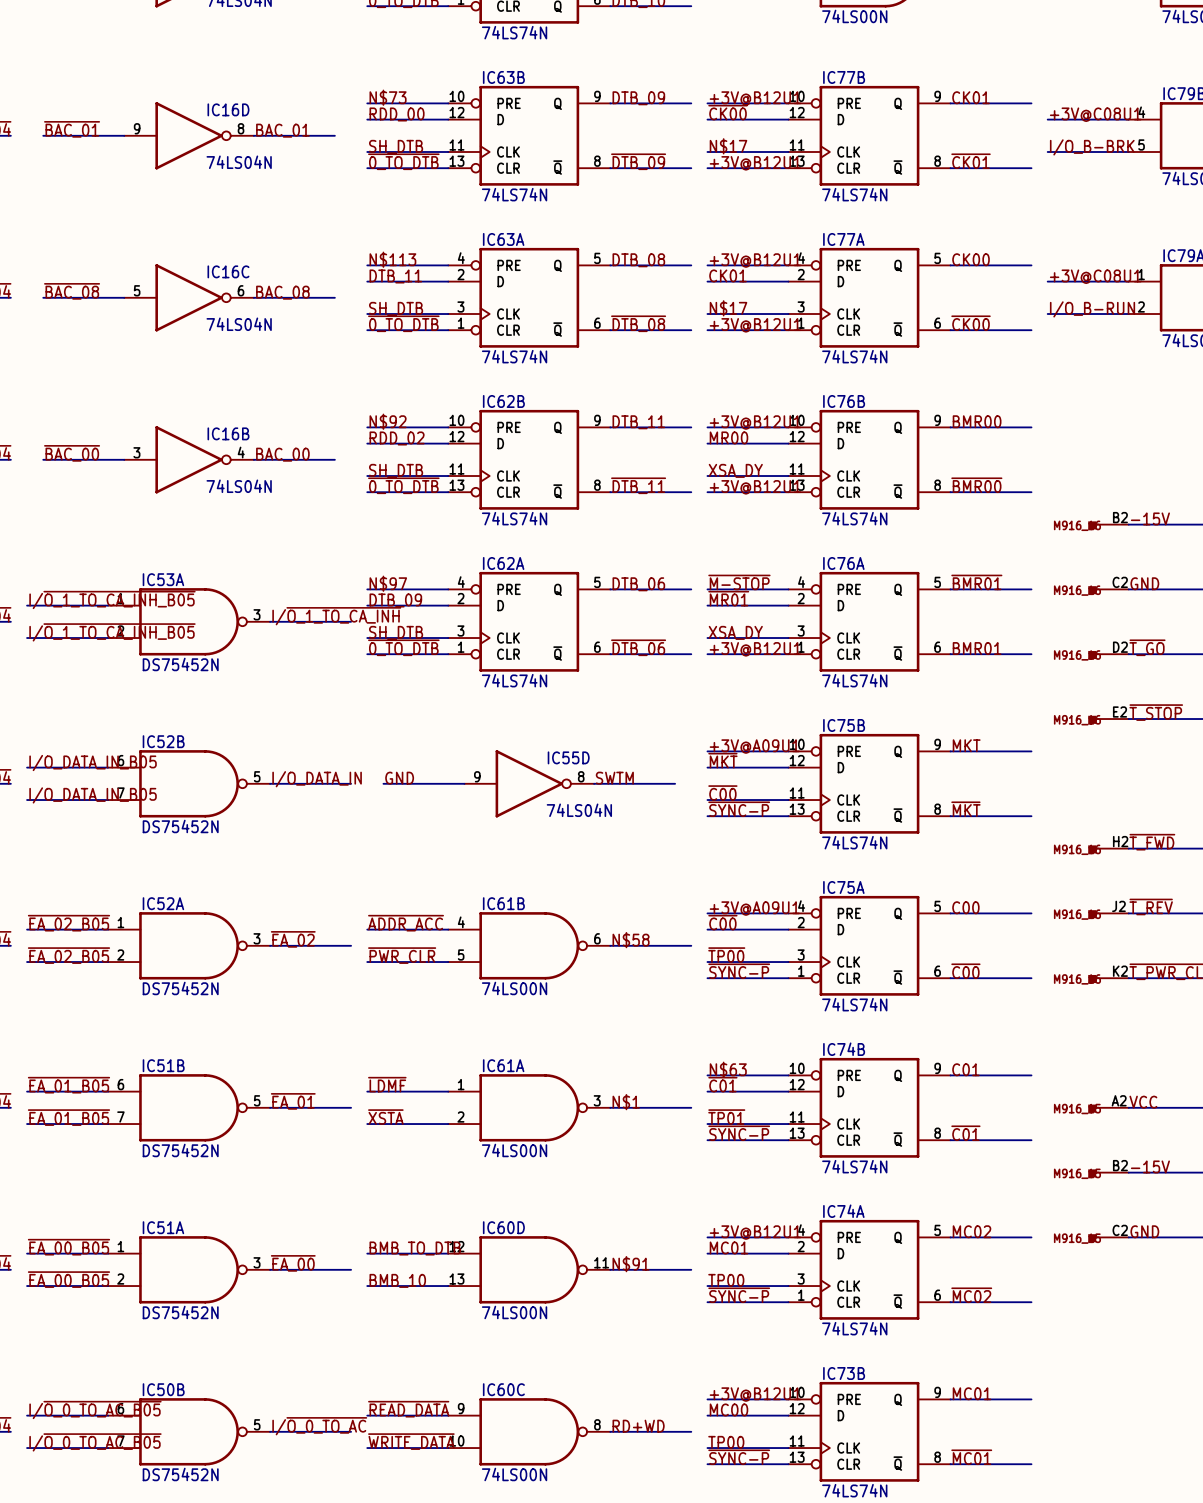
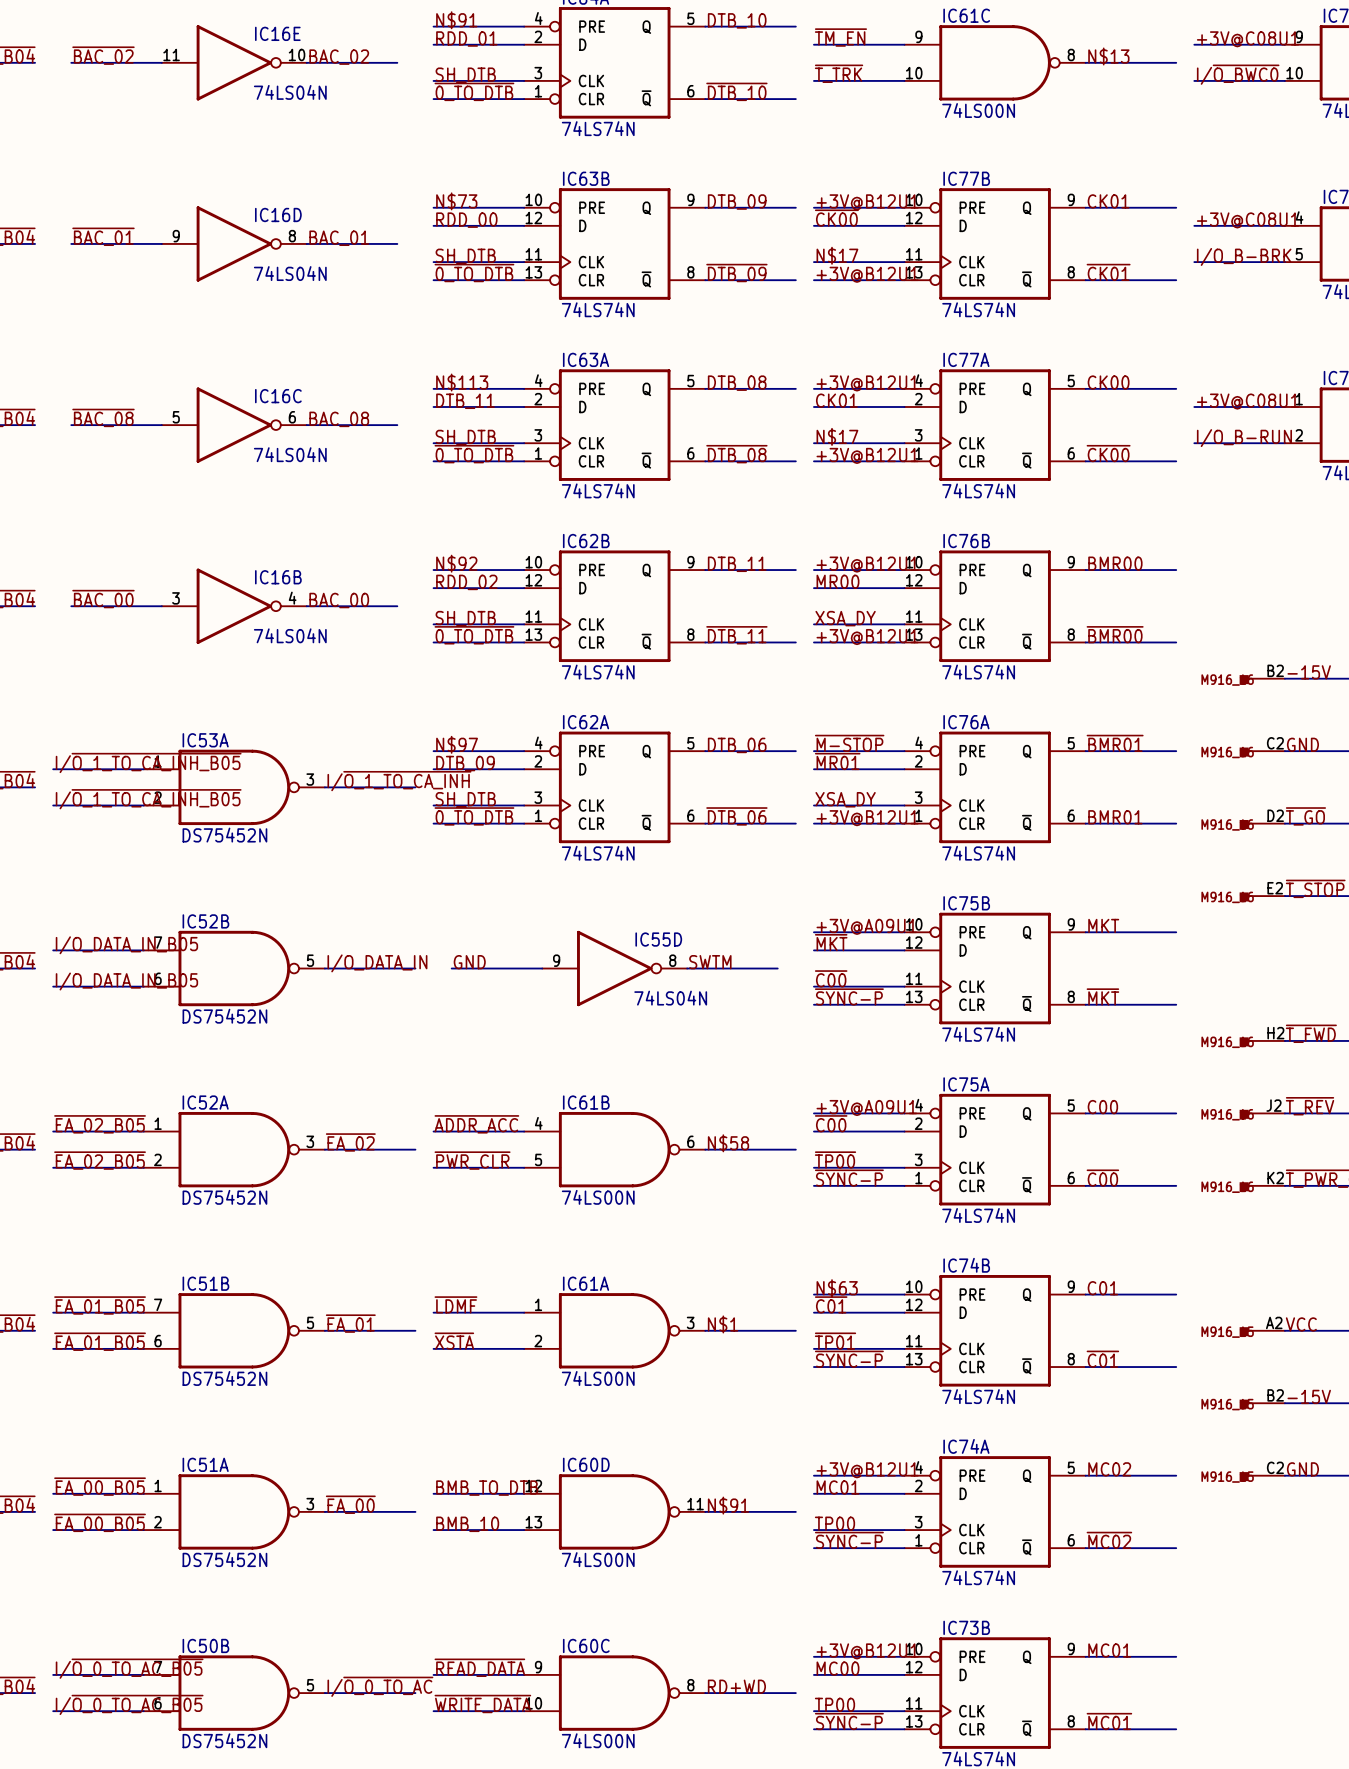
IC52B flip: as is (189, 783) -> up-down (234, 968)
IC51B flip: as is (189, 1107) -> up-down (234, 1330)
IC50B flip: as is (189, 1431) -> up-down (234, 1693)

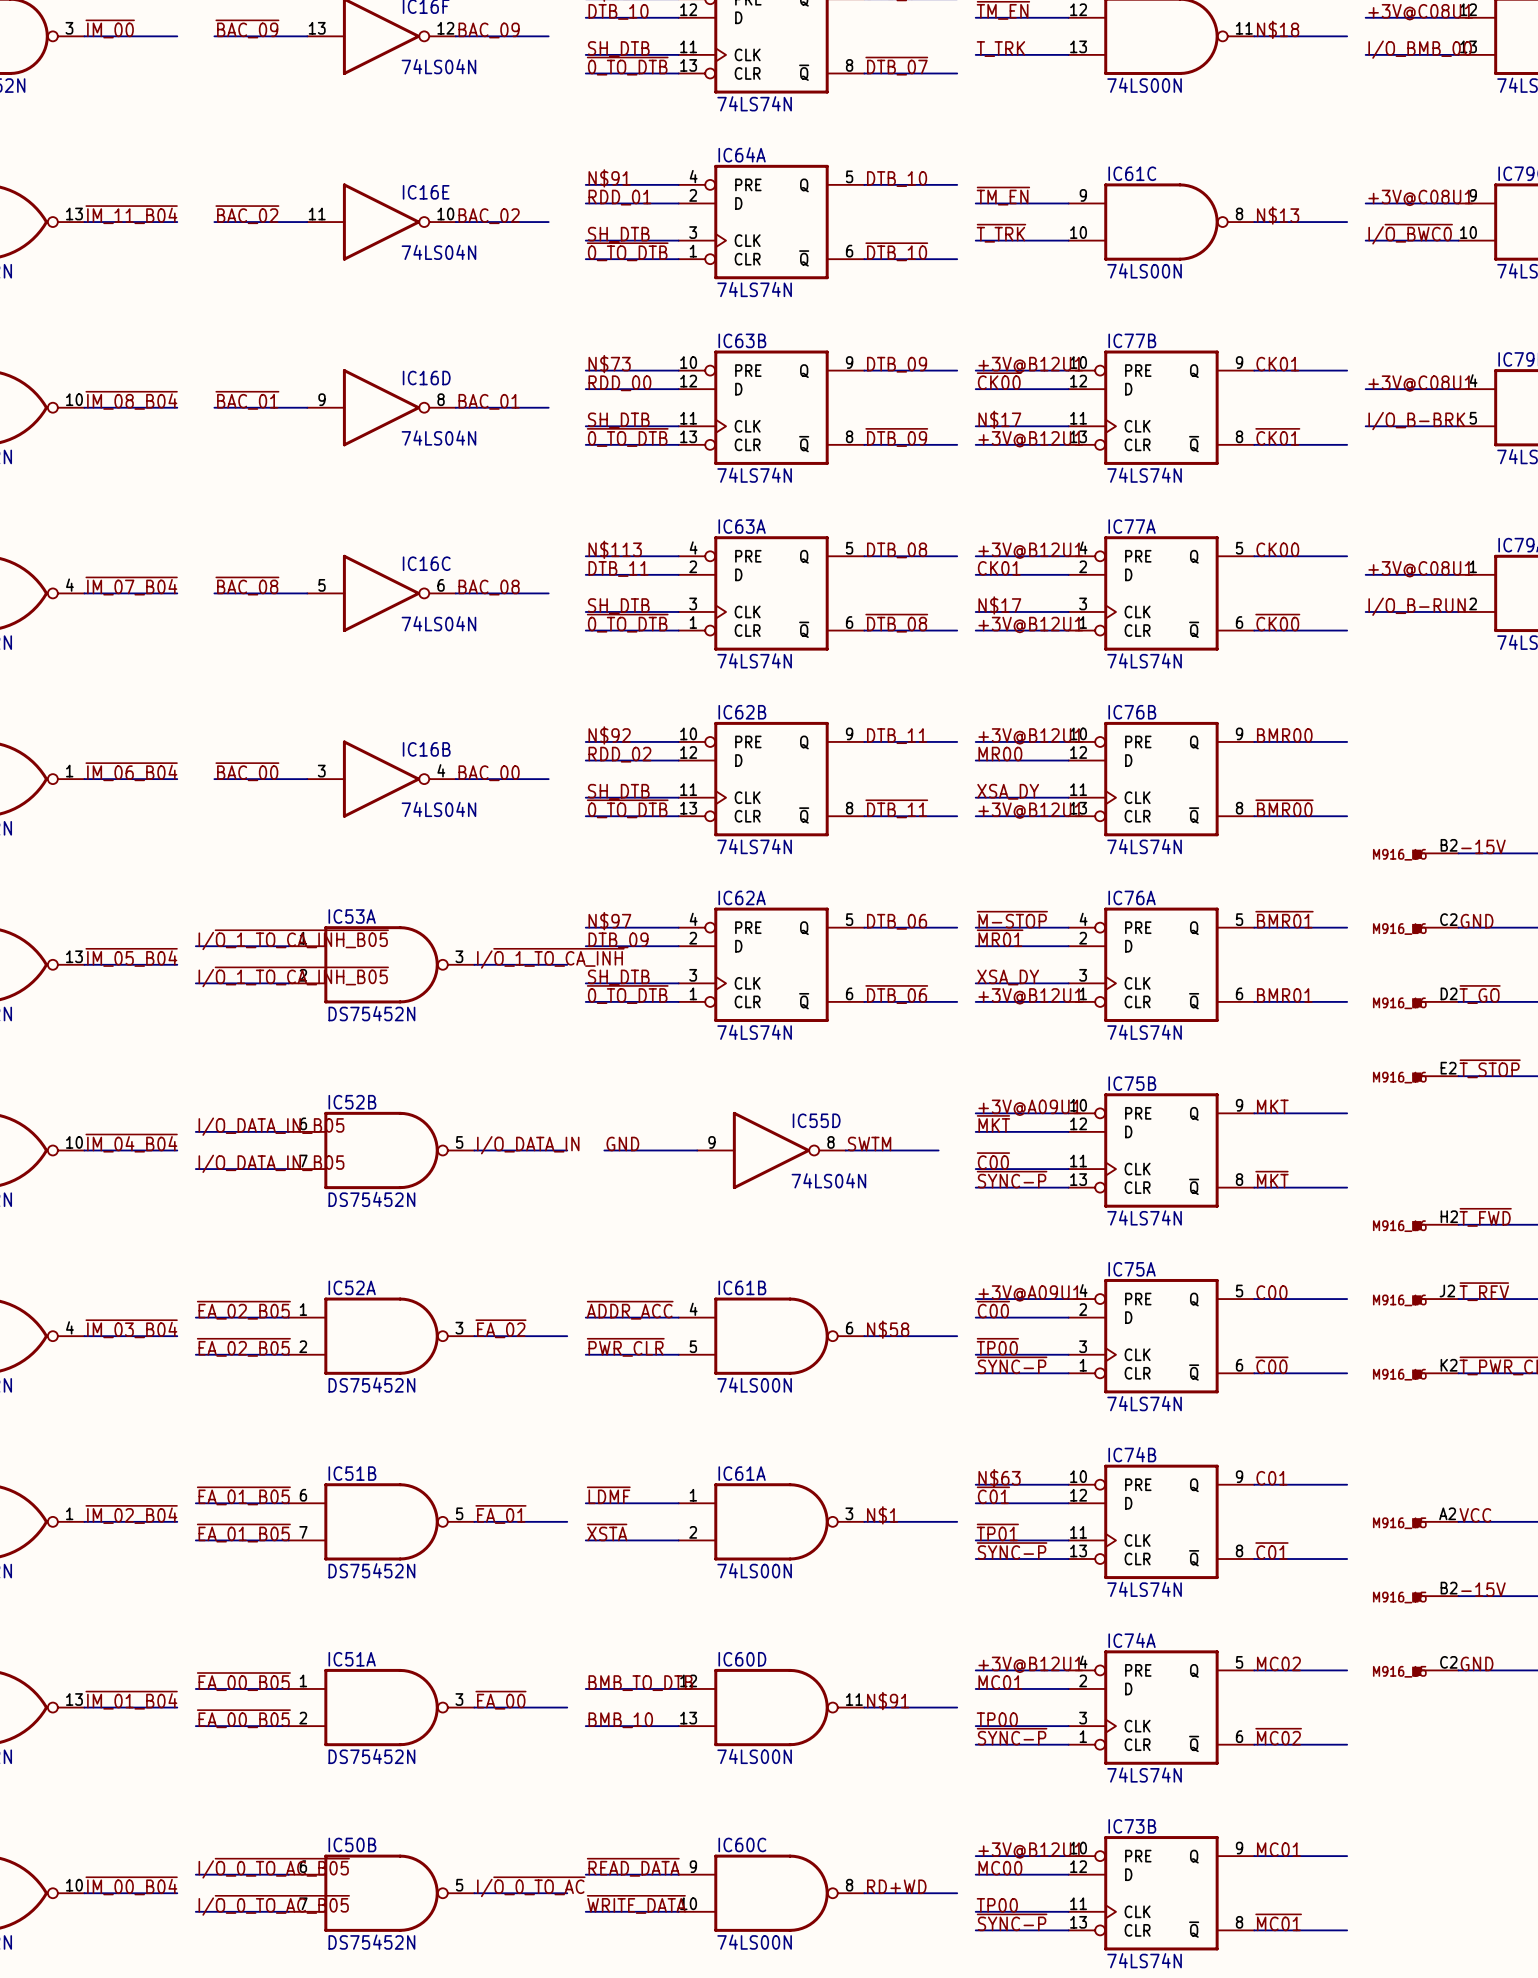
IC52B flip: as is (234, 968) -> up-down (381, 1150)
IC51B flip: as is (234, 1330) -> up-down (381, 1521)
IC50B flip: as is (234, 1693) -> up-down (381, 1893)

